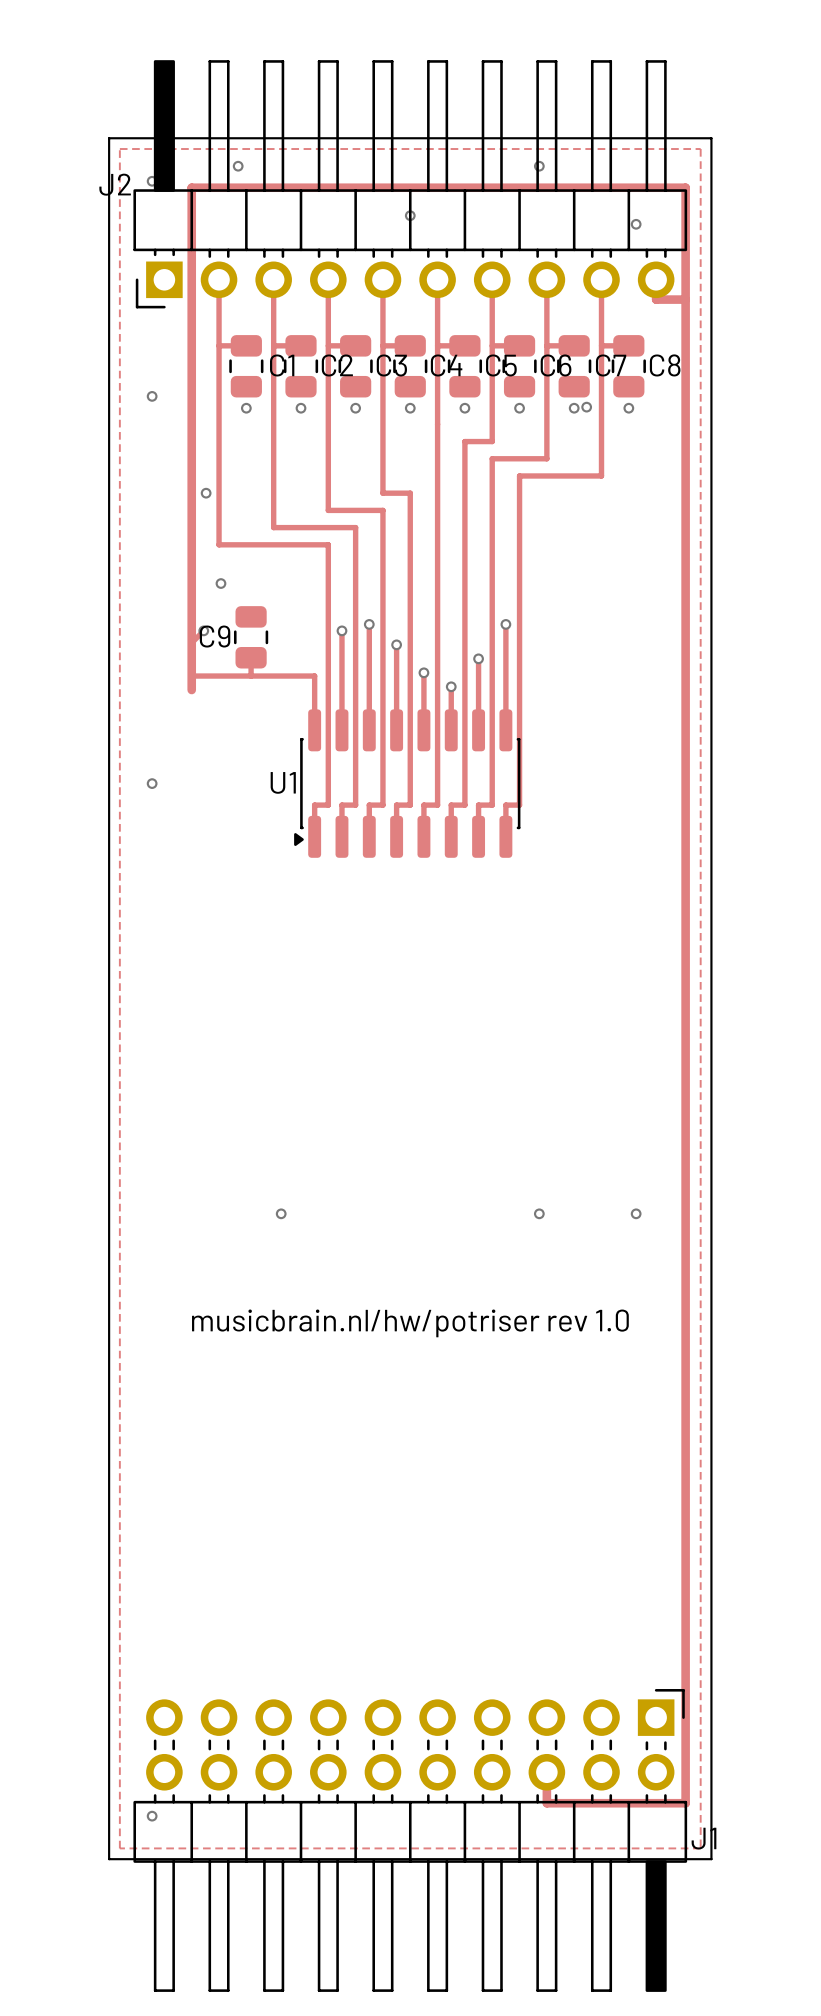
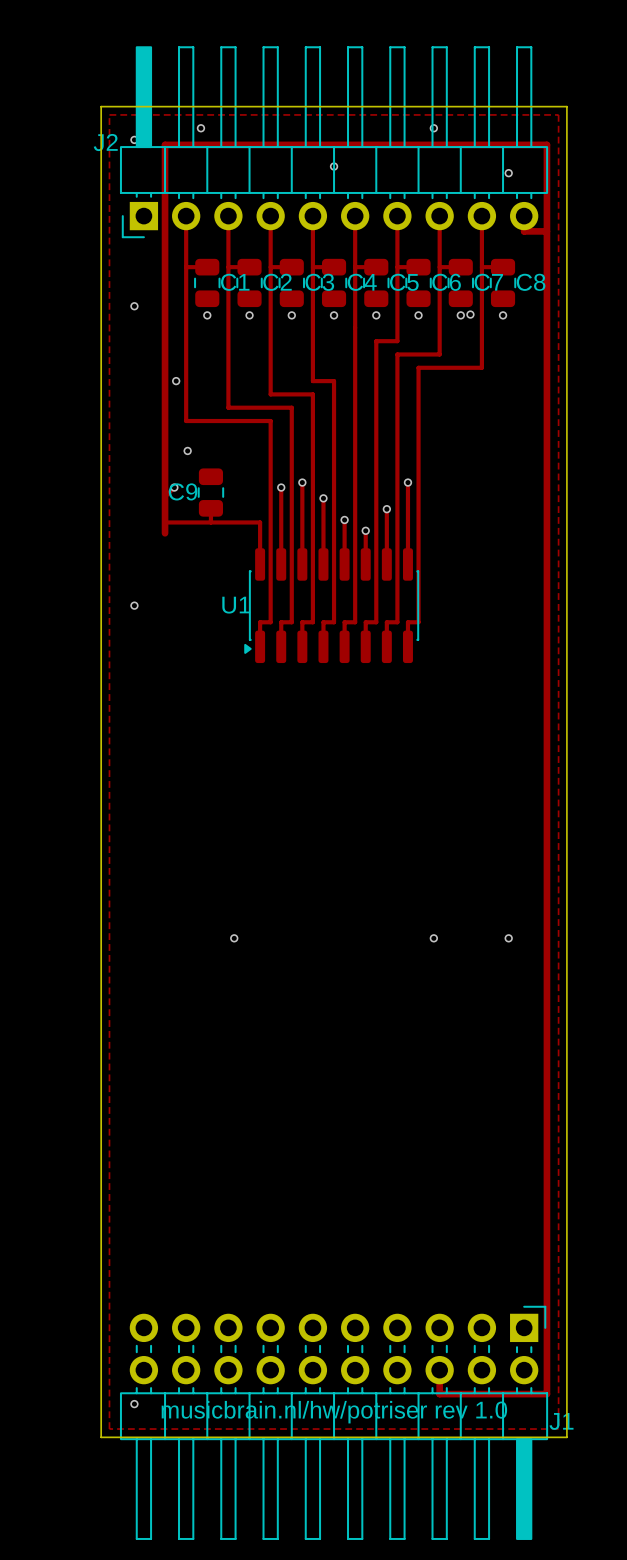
text position: musicbrain.nl/hw/potriser rev 1.0 (410, 1323) -> musicbrain.nl/hw/potriser rev 1.0 (334, 1412)

